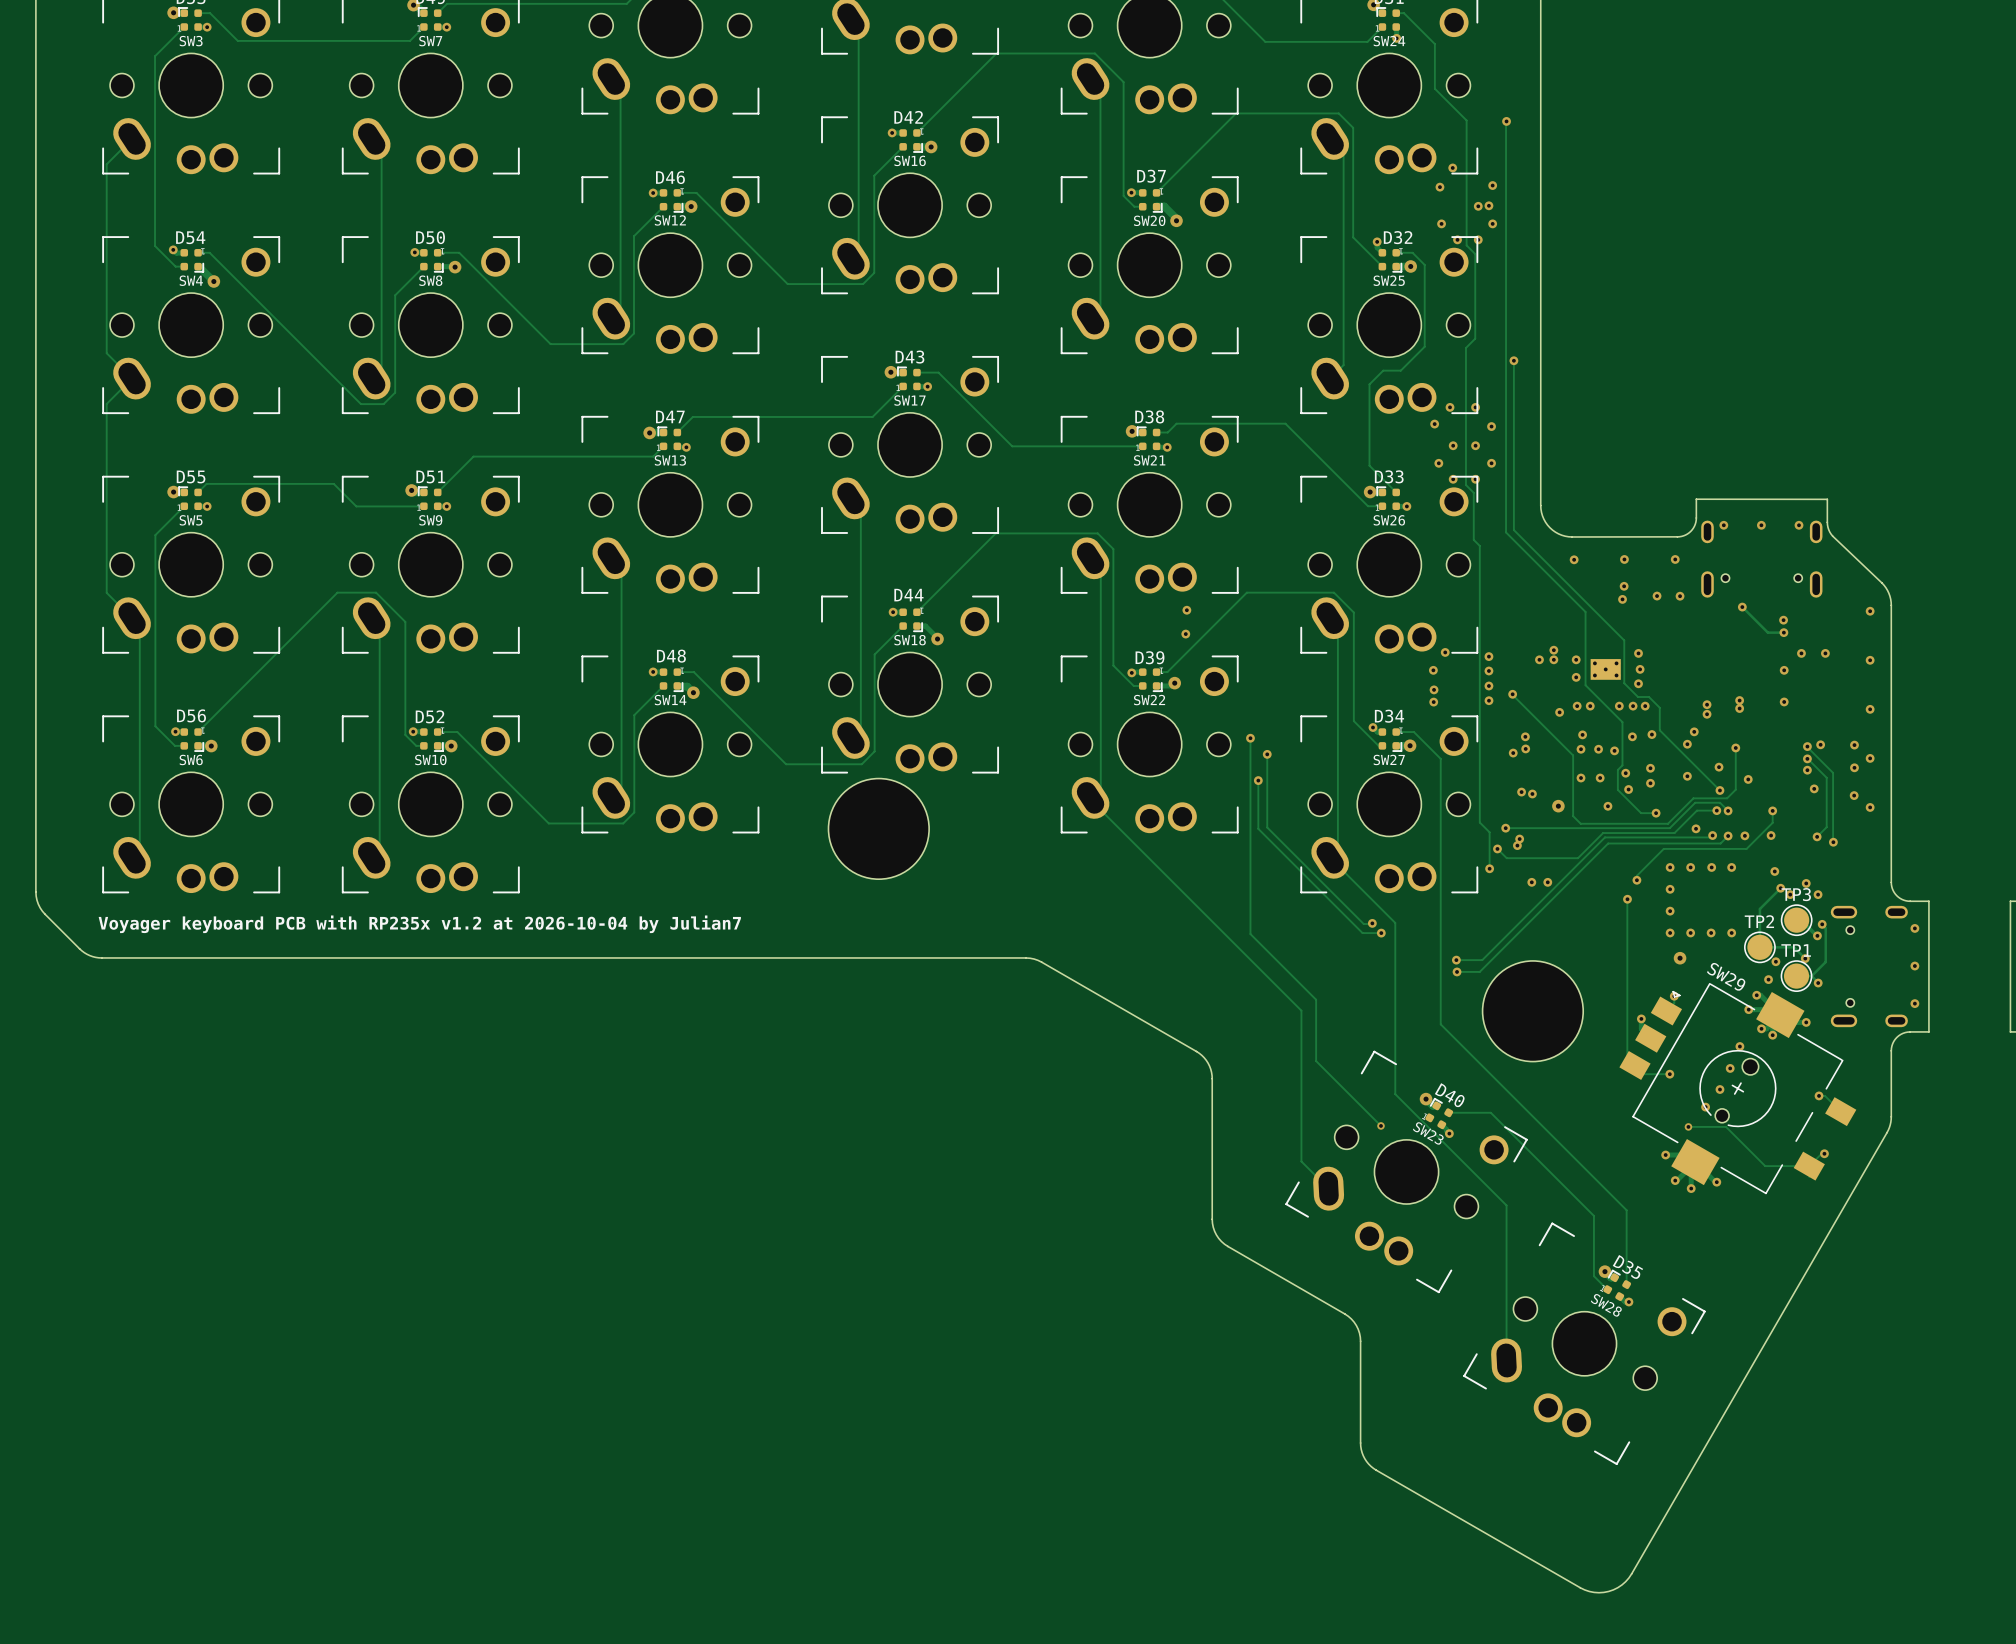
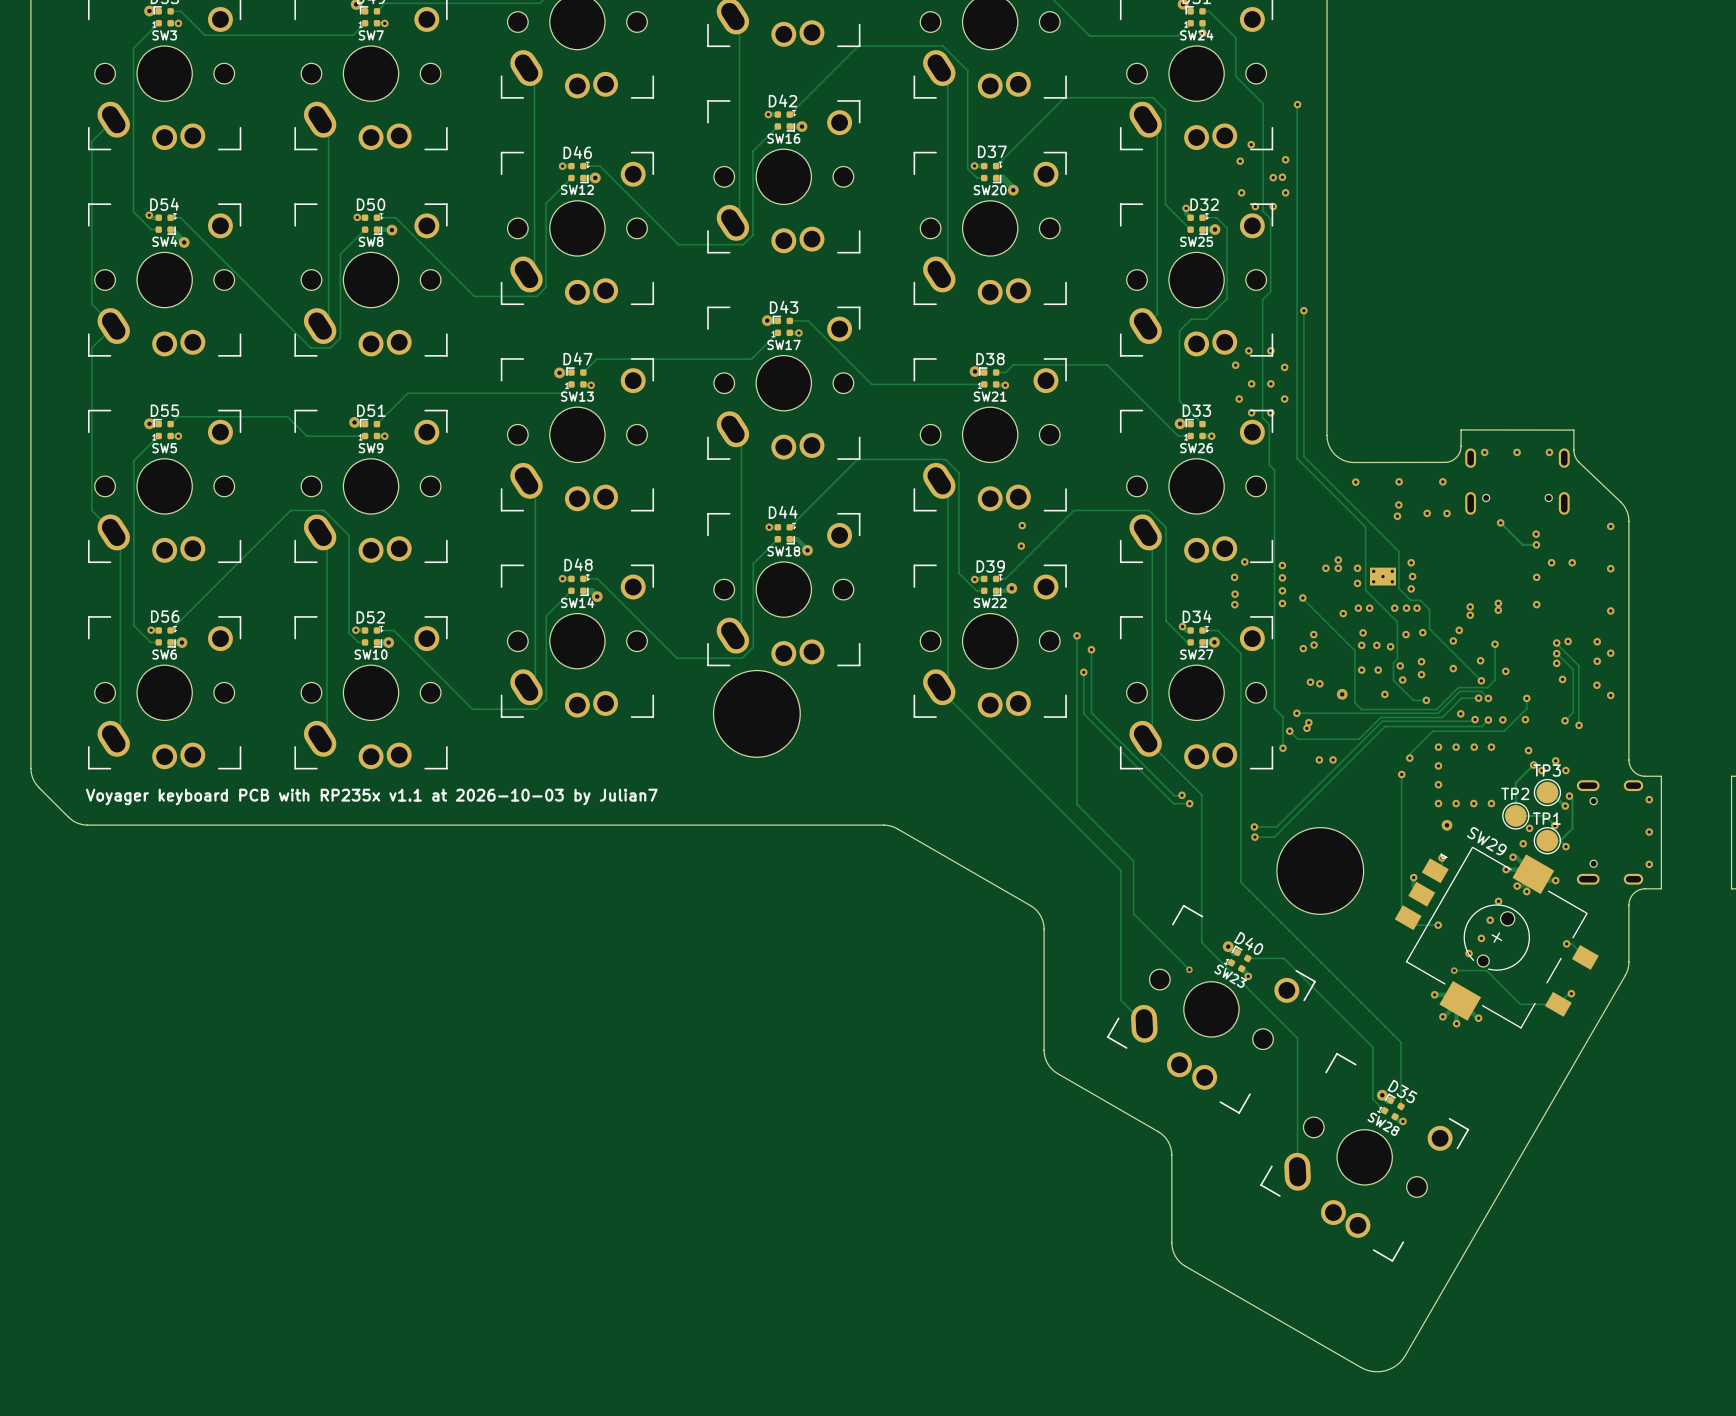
text: Voyager keyboard PCB with RP235x v1.2 at 2026-10-04 by Julian7 (419, 924) -> Voyager keyboard PCB with RP235x v1.1 at 2026-10-03 by Julian7 (371, 796)

